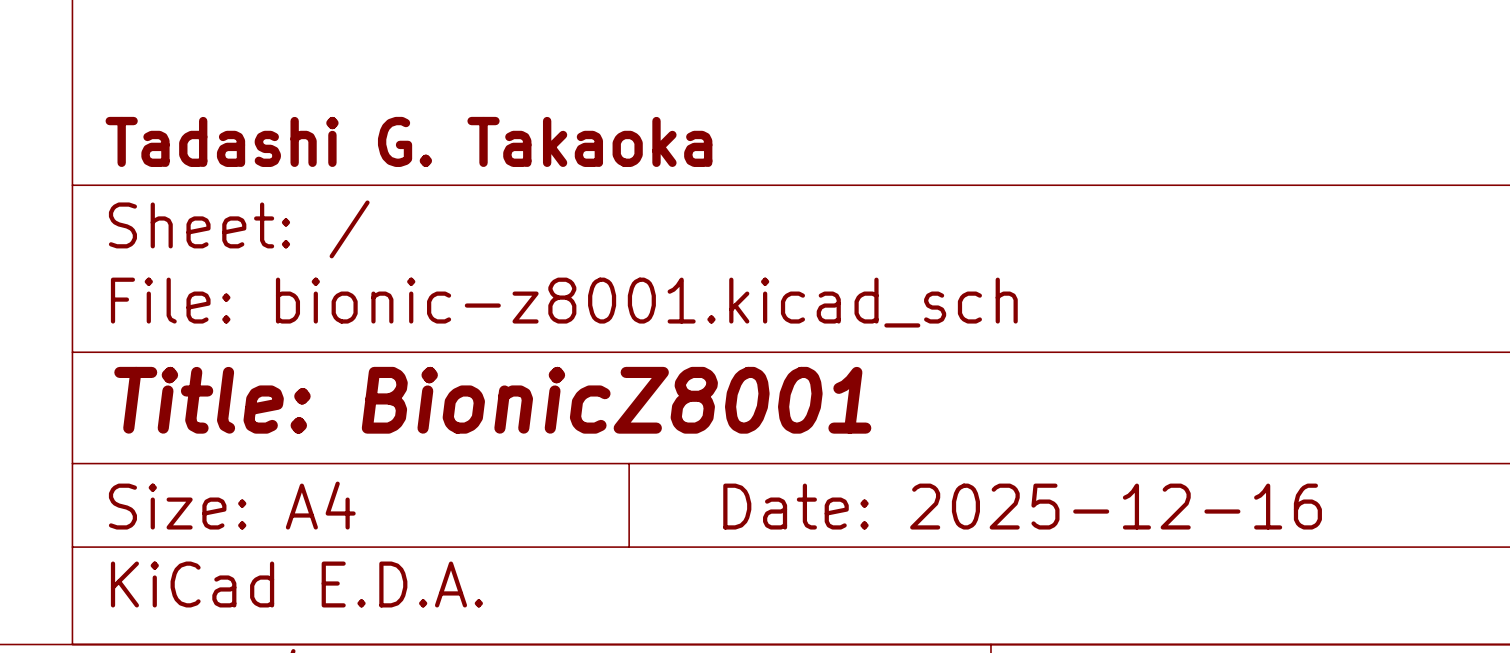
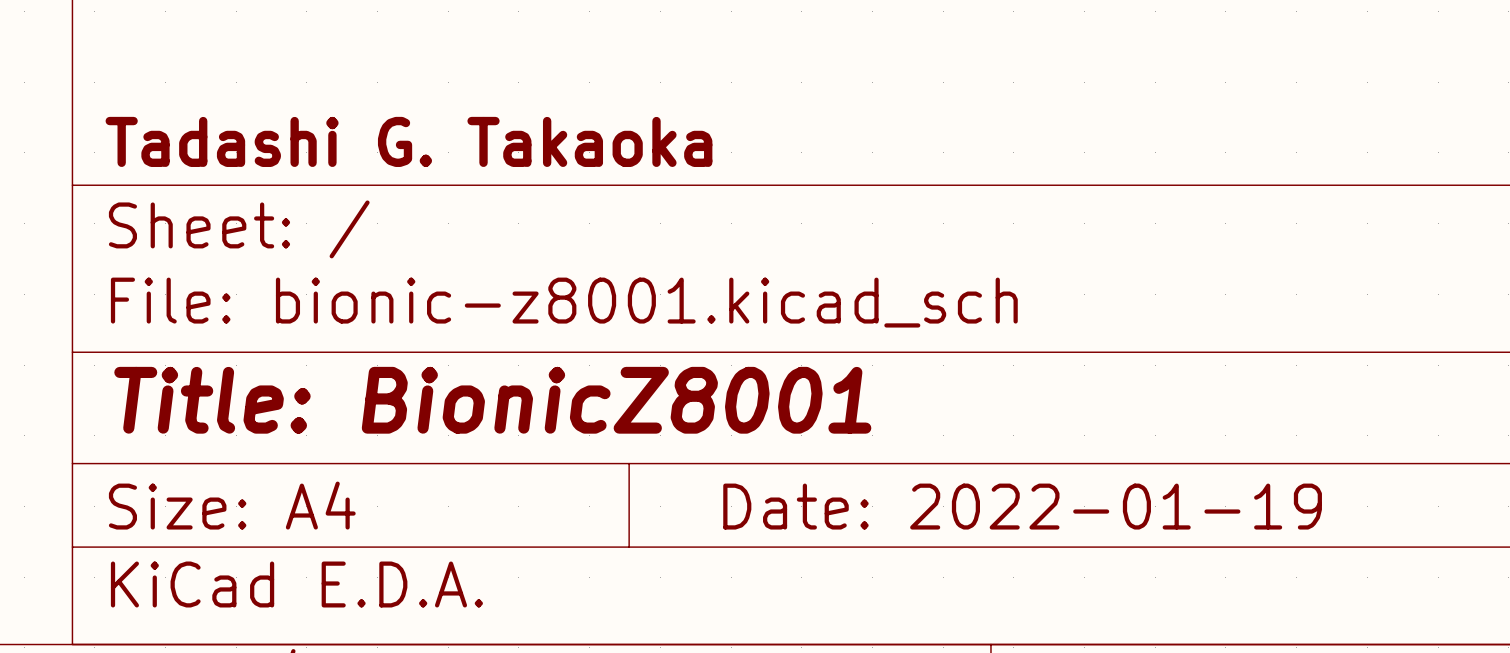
title block: Date: 2025-12-16 (1022, 506) -> Date: 2022-01-19 (1022, 506)

